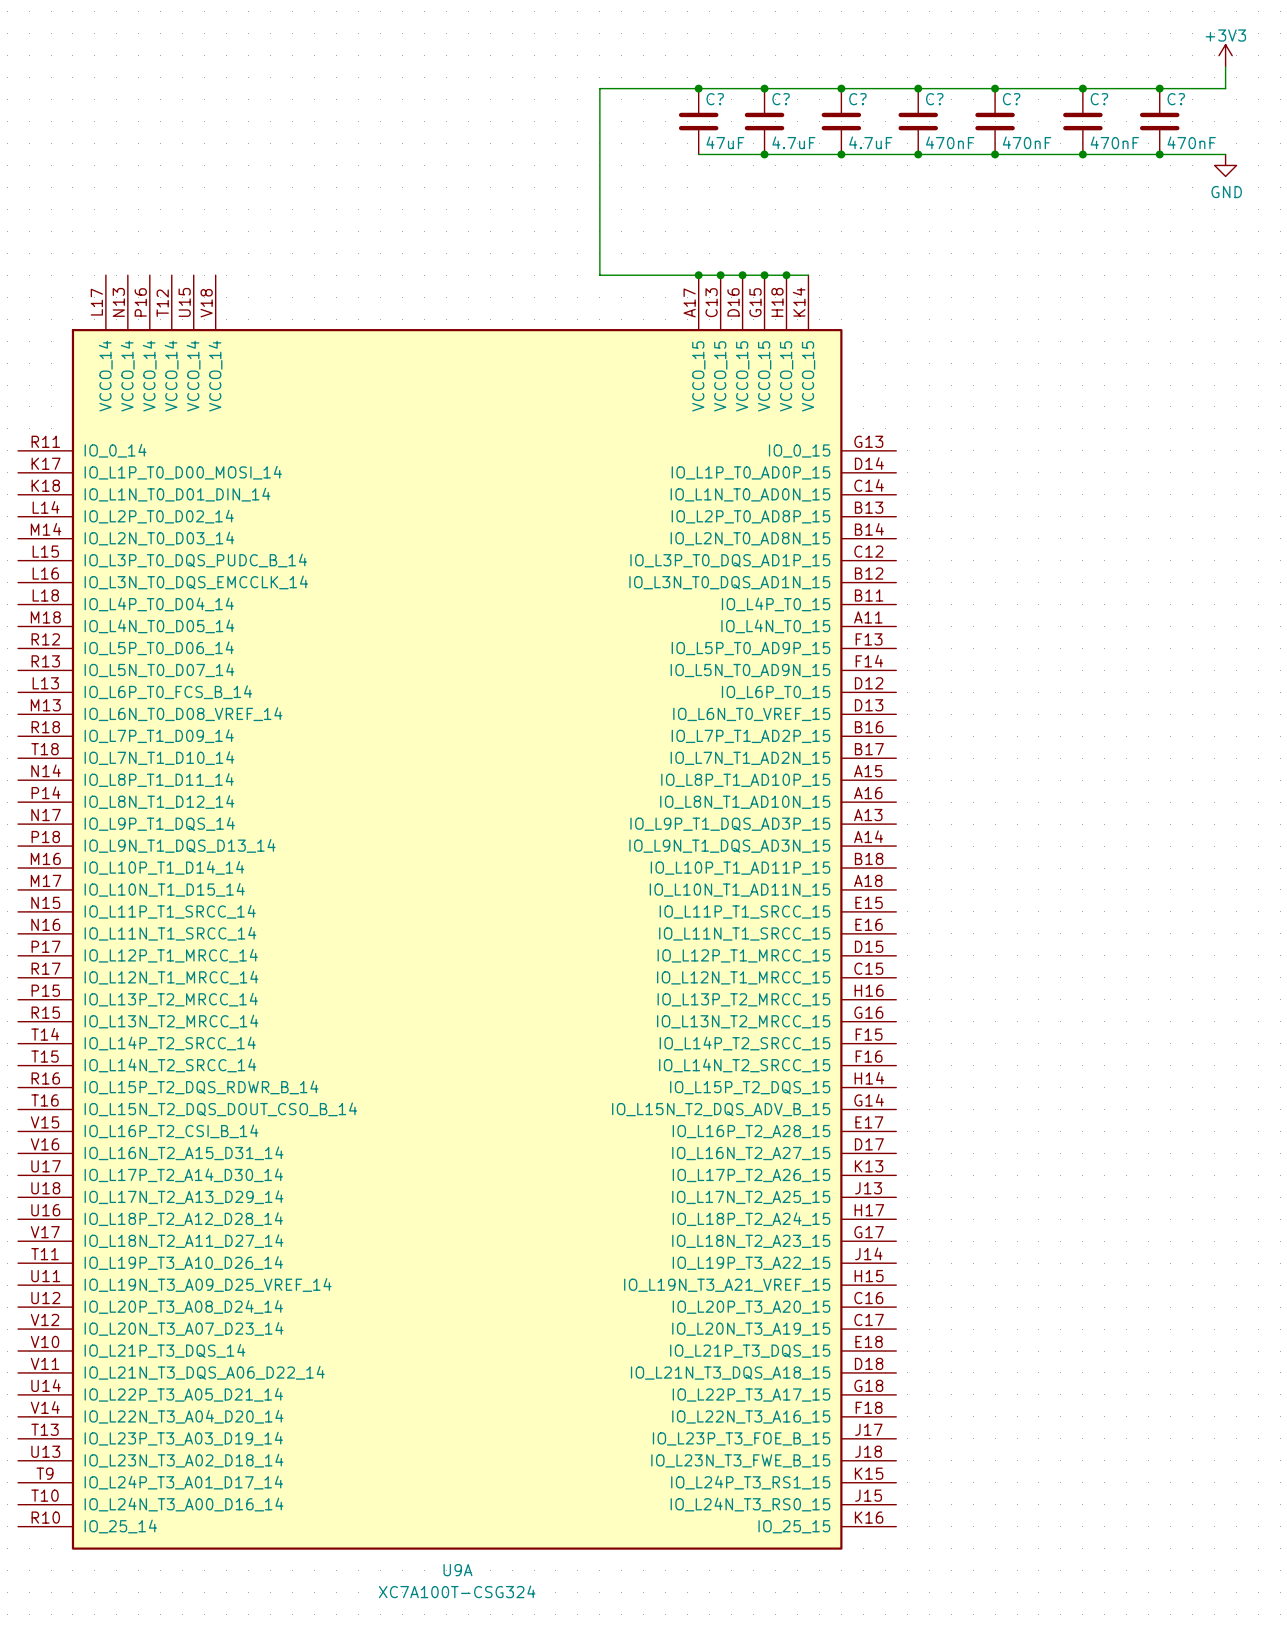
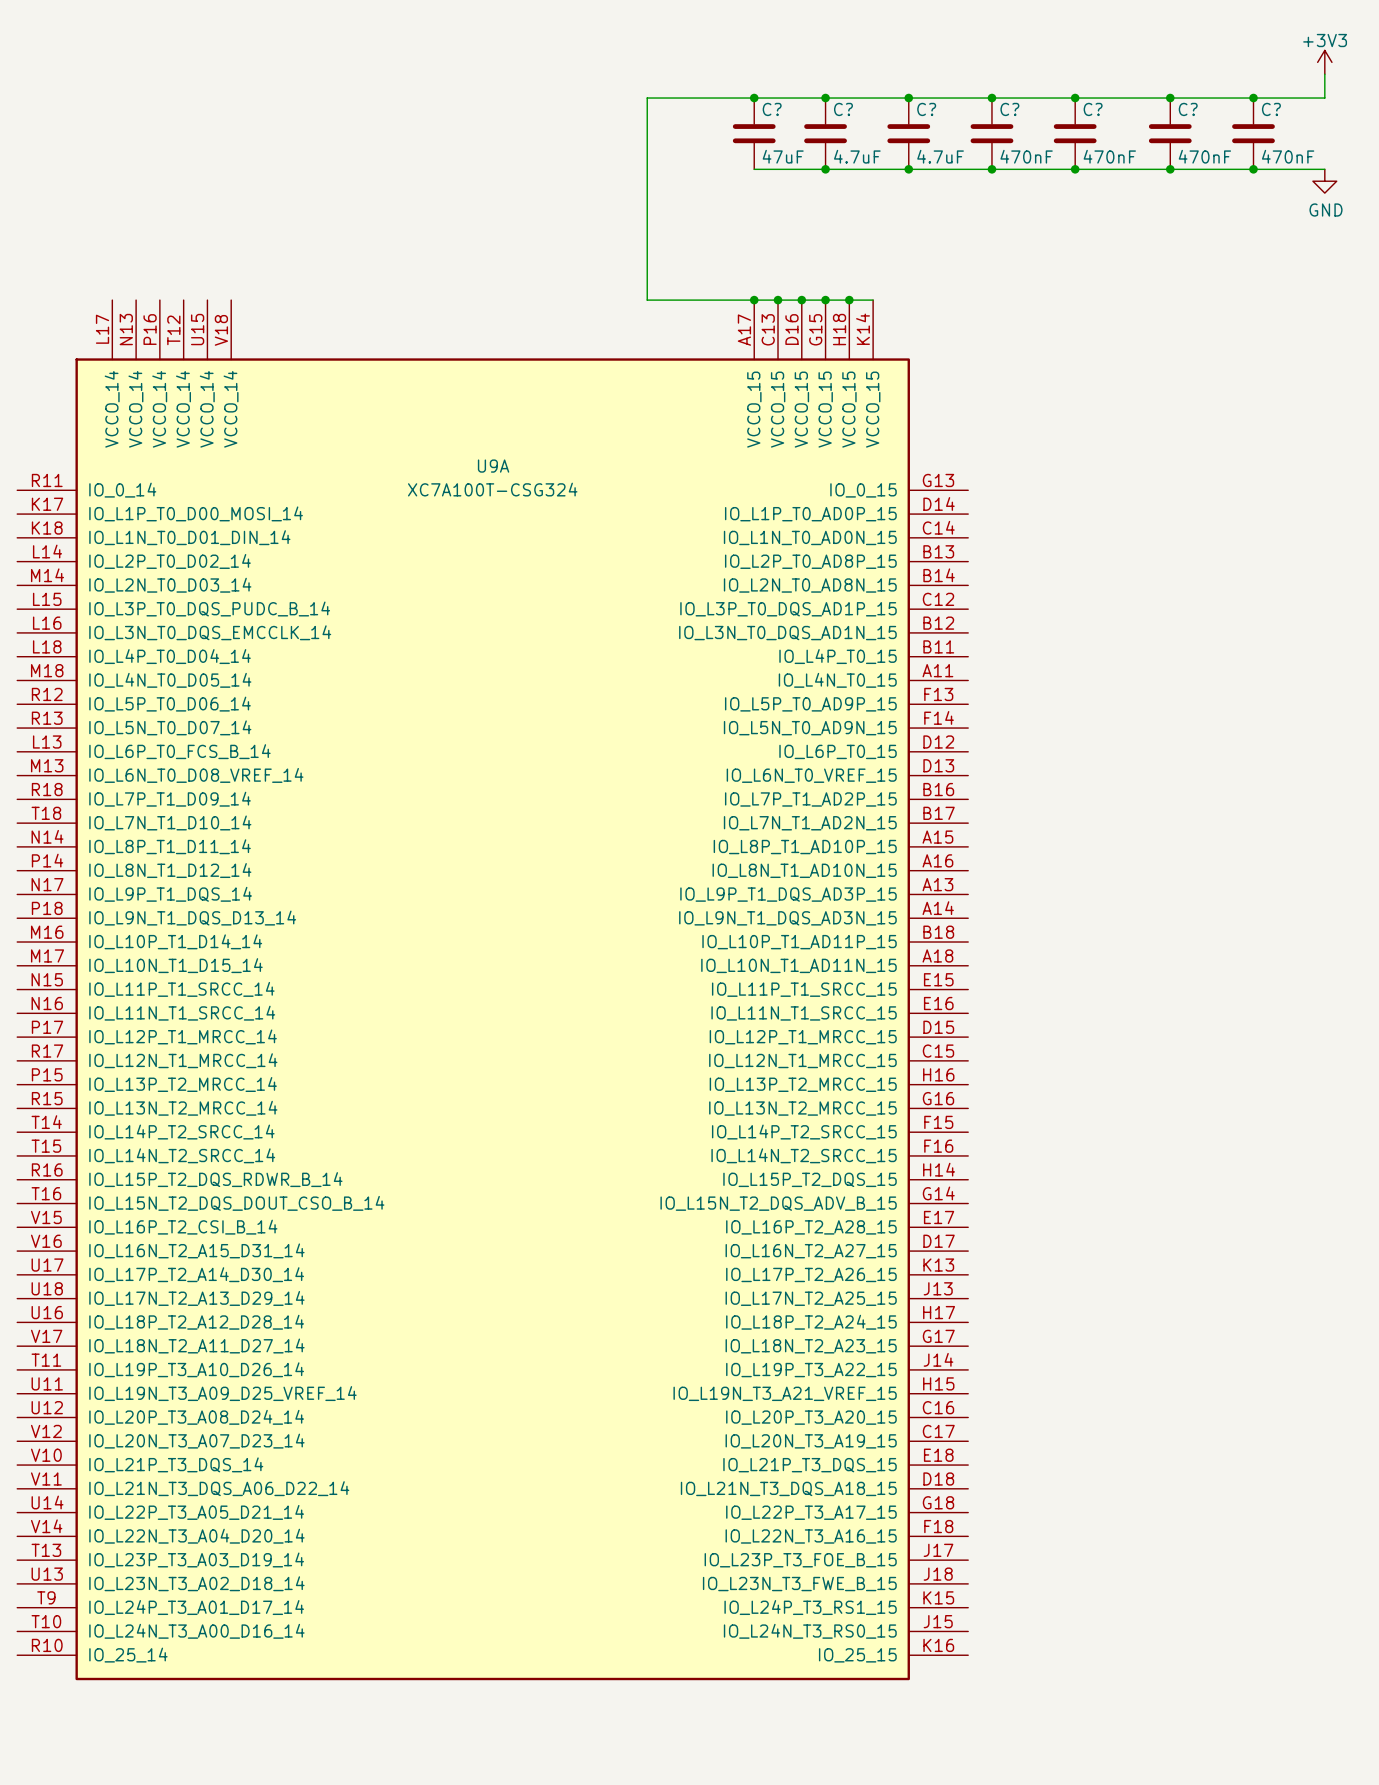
U9A name position: U9A (457, 1570) -> U9A (493, 466)
U9A value position: XC7A100T-CSG324 (457, 1591) -> XC7A100T-CSG324 (492, 489)

